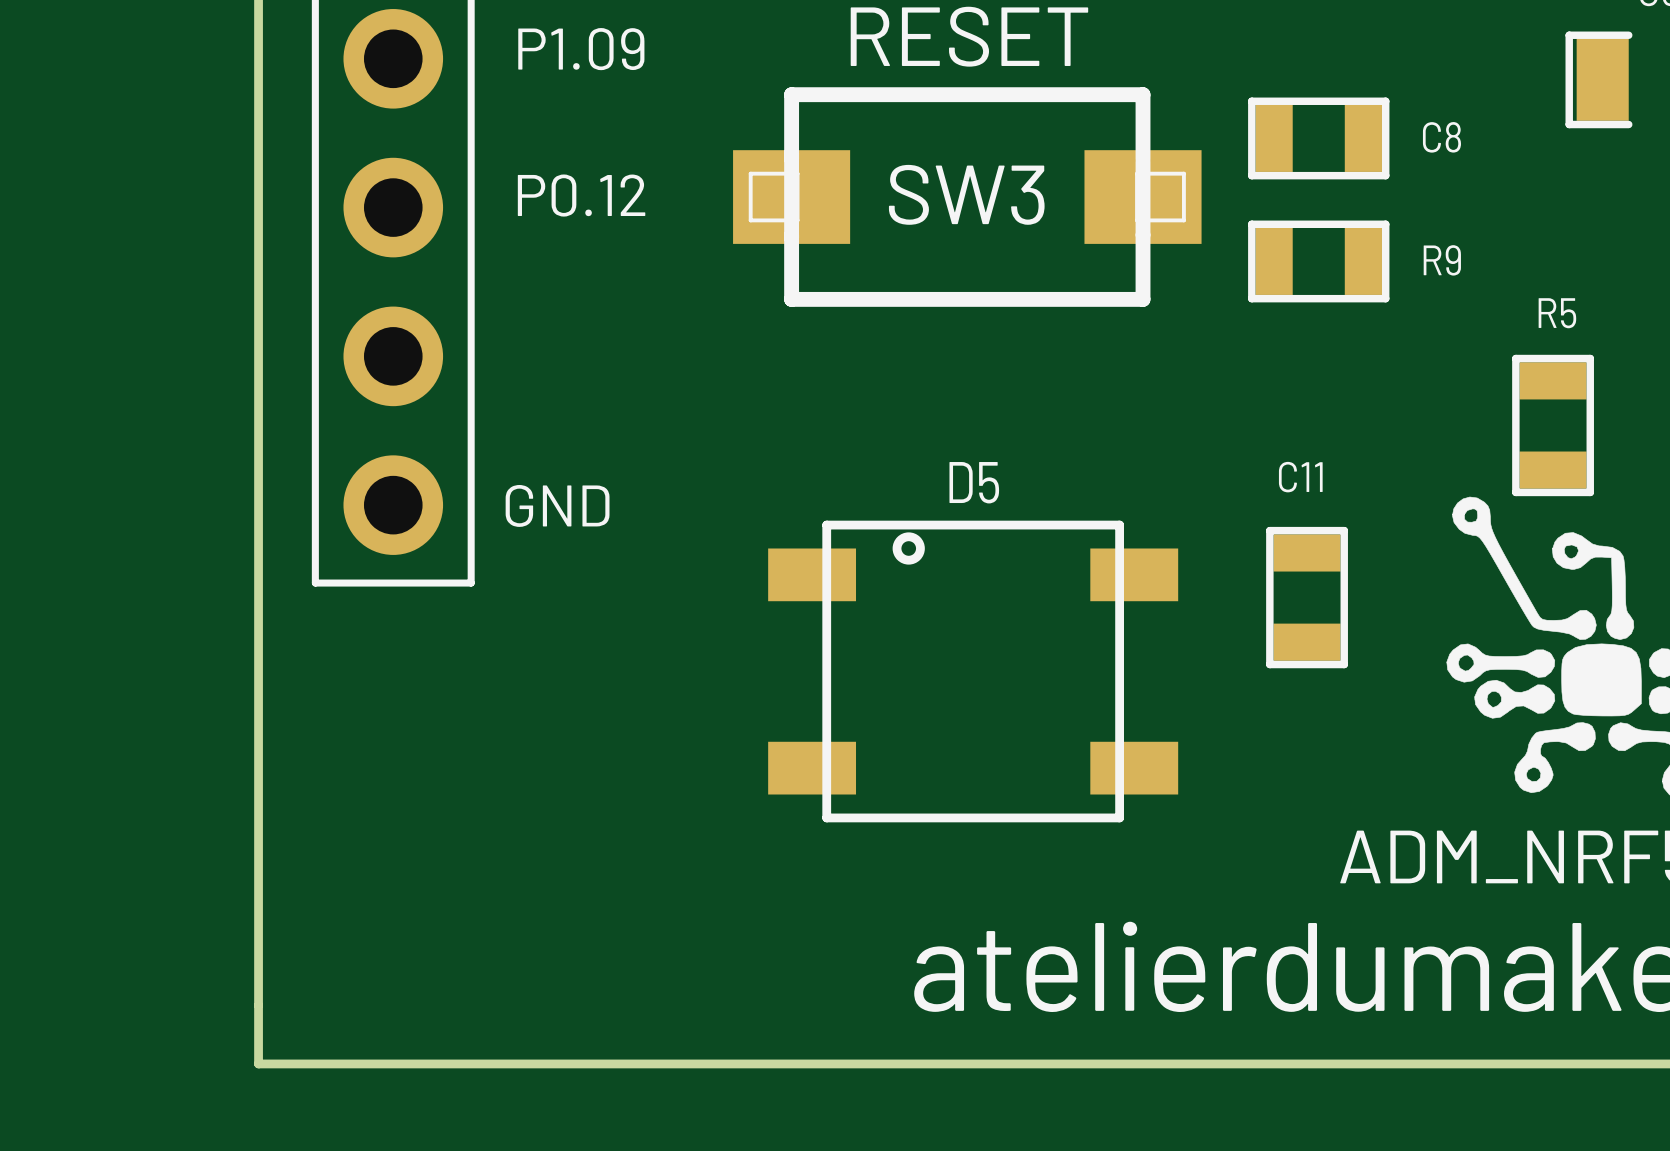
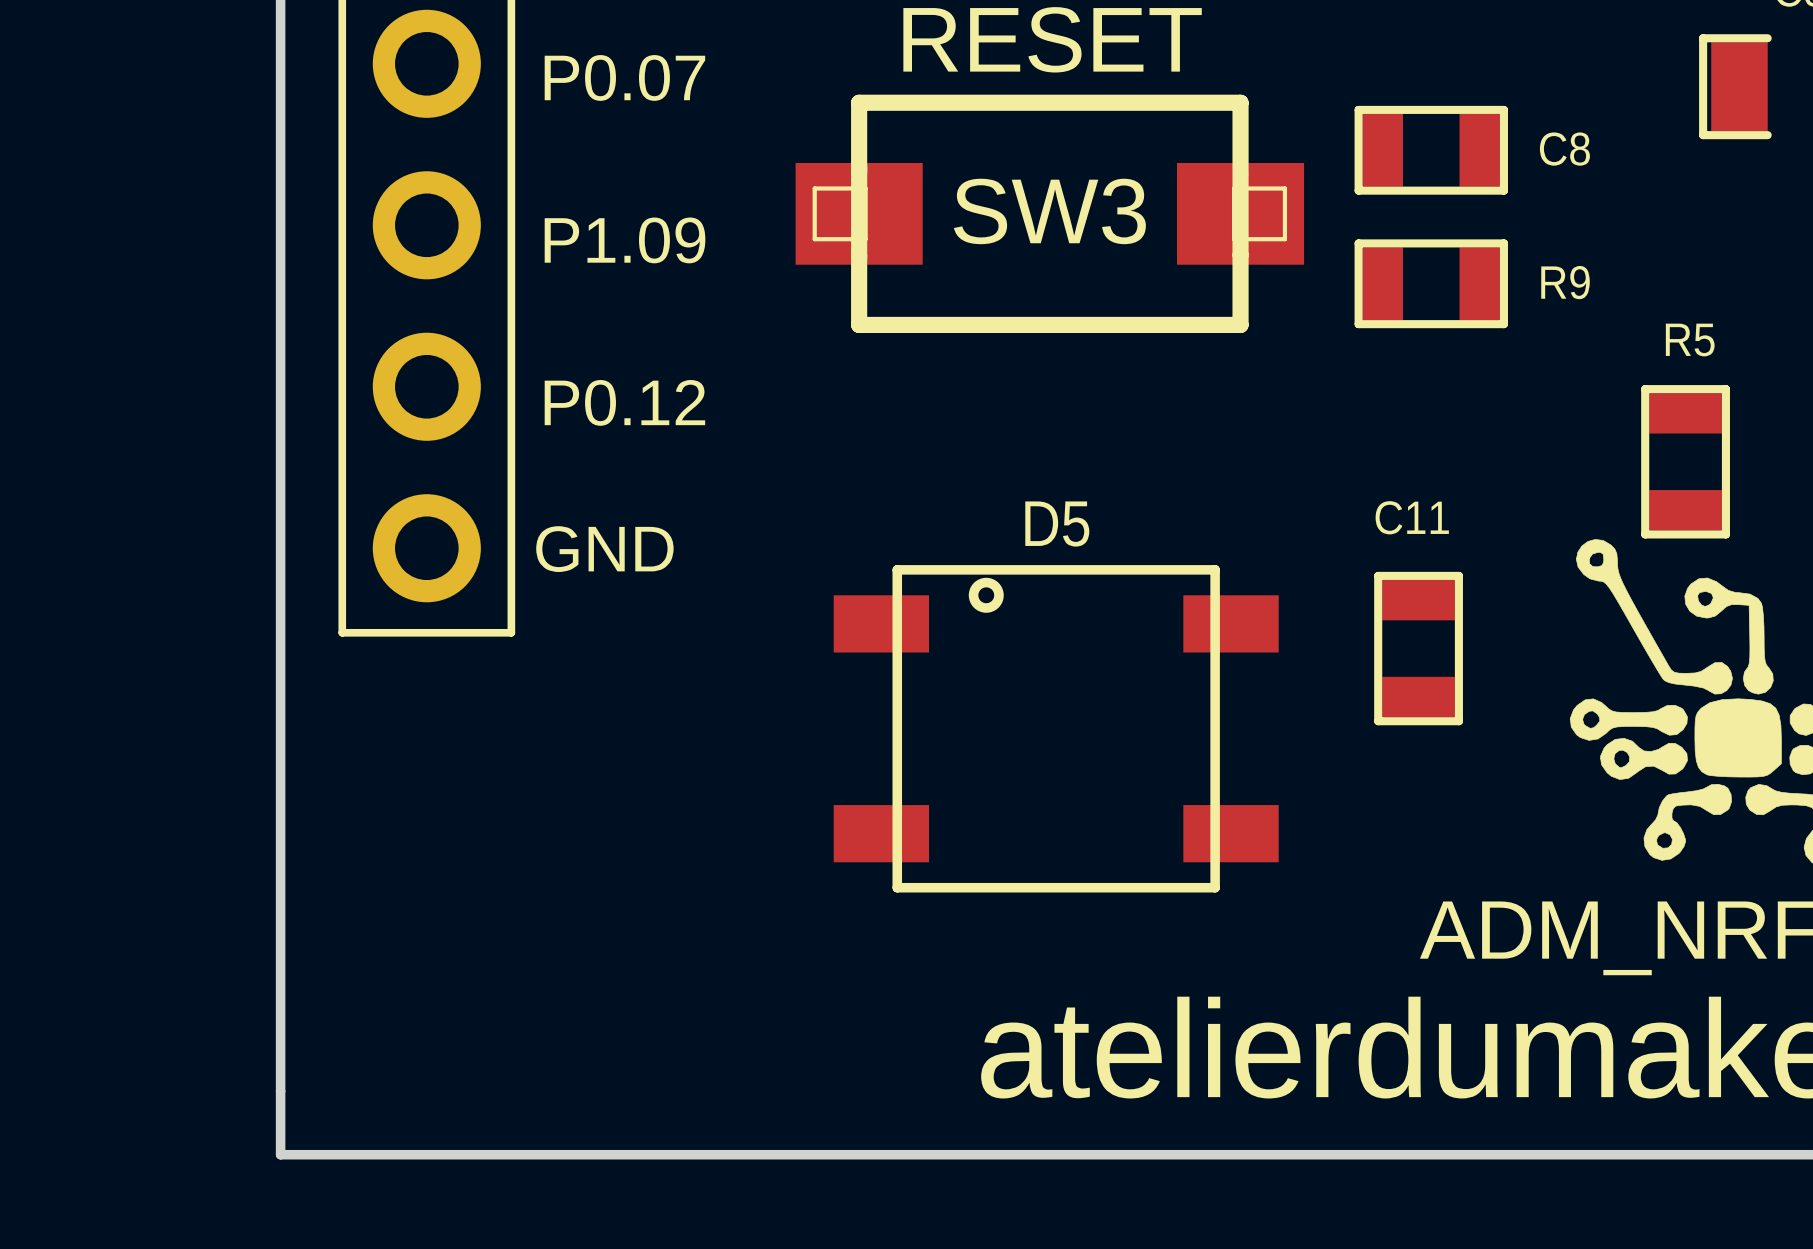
text: P1.09 (581, 49) -> P0.07 (624, 77)
text: P0.12 (581, 195) -> P1.09 (625, 240)
text: none -> P0.12 (624, 402)

